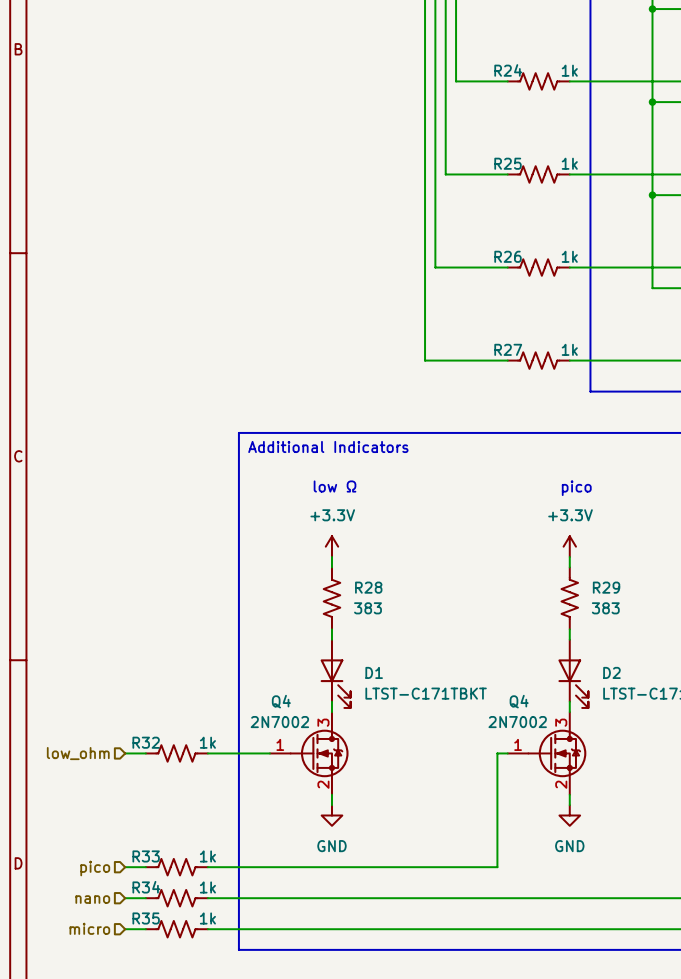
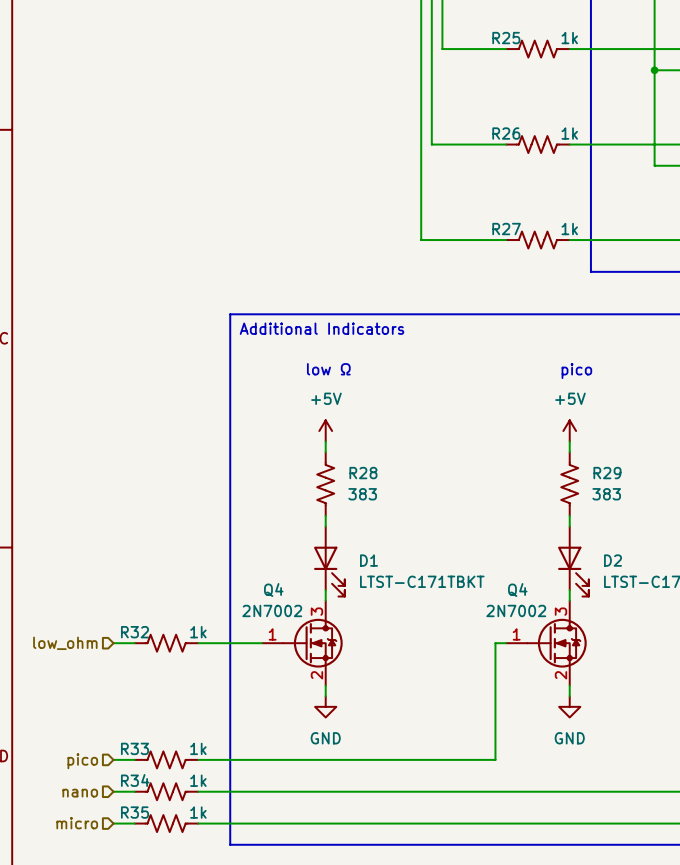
power symbol: +3.3V (331, 546) -> +5V (325, 431)
power symbol: +3.3V (569, 546) -> +5V (569, 431)

